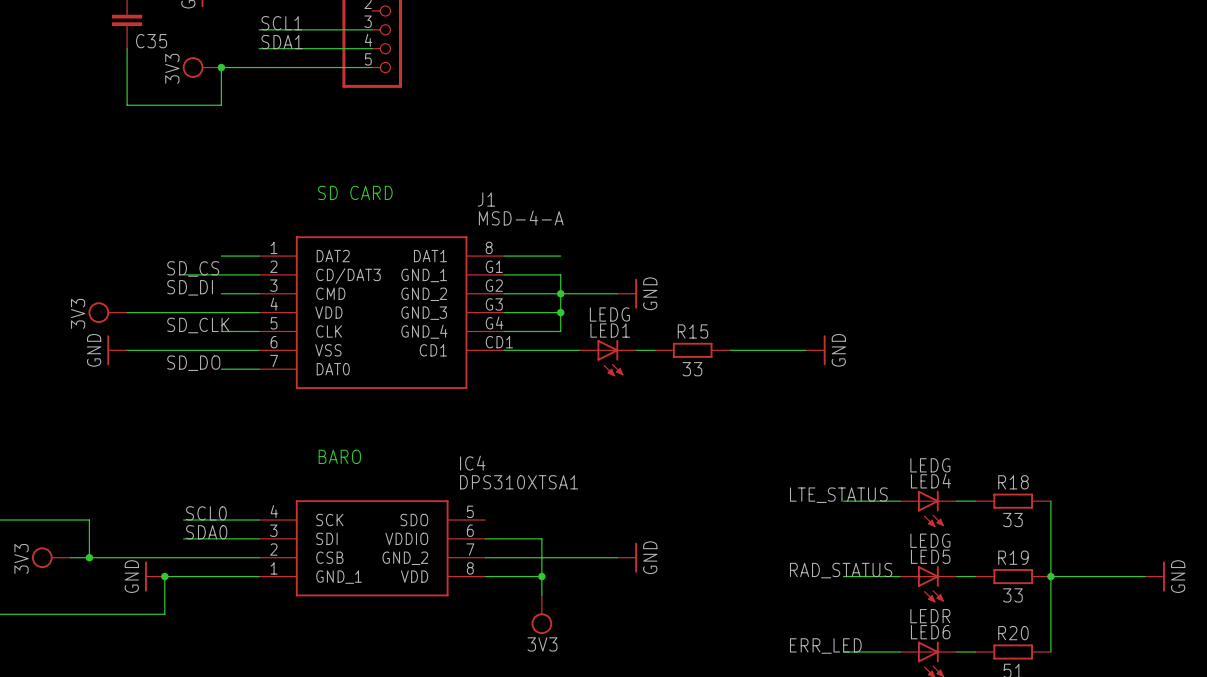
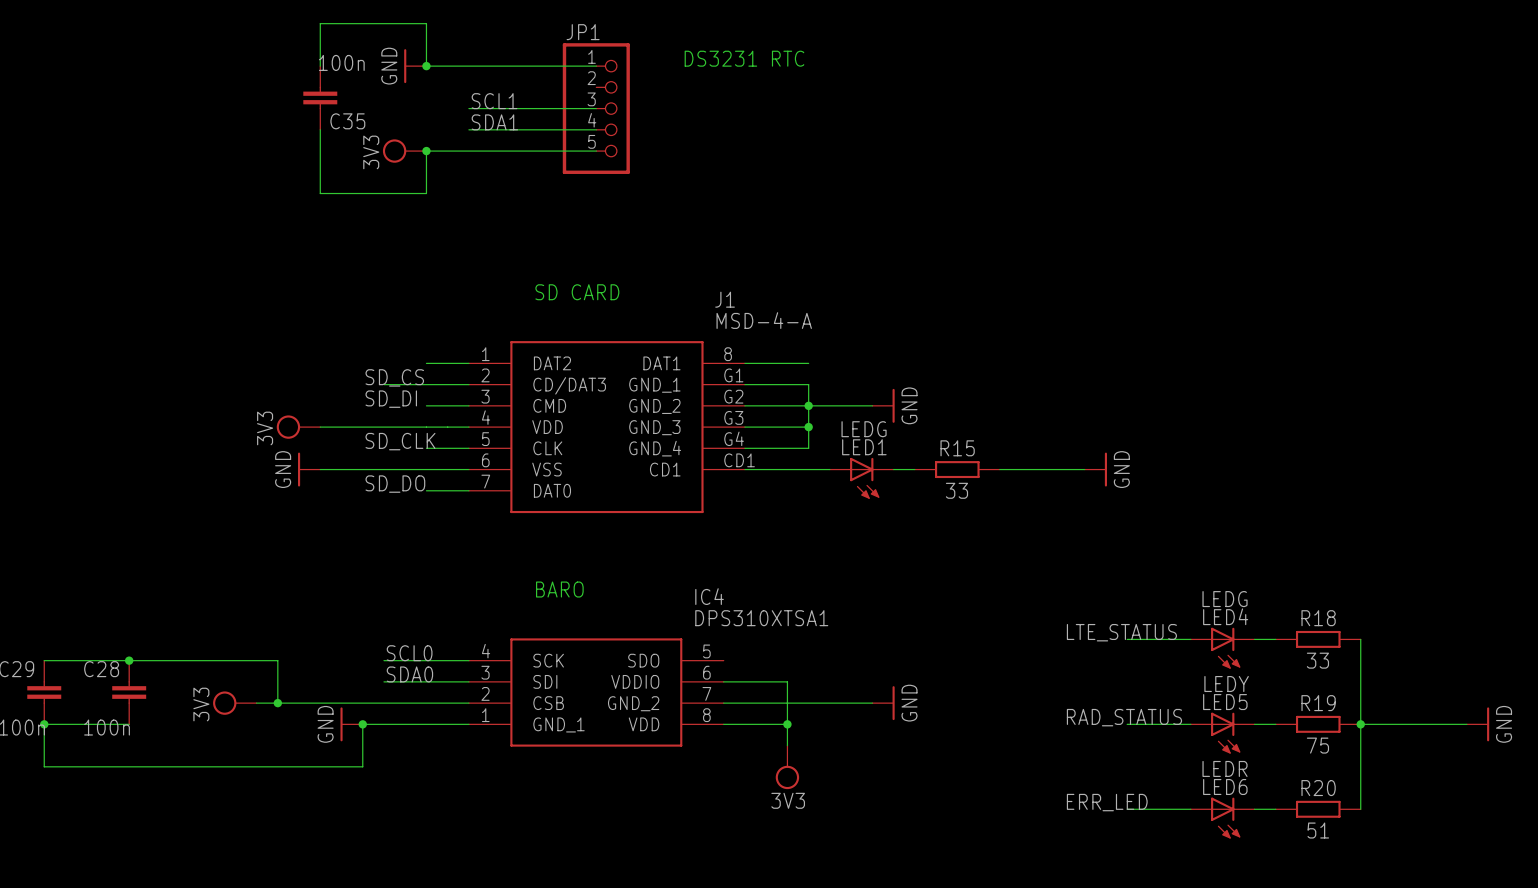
LED5 value: LEDG (930, 540) -> LEDY (1226, 684)
R19 value: 33 (1012, 595) -> 75 (1317, 745)

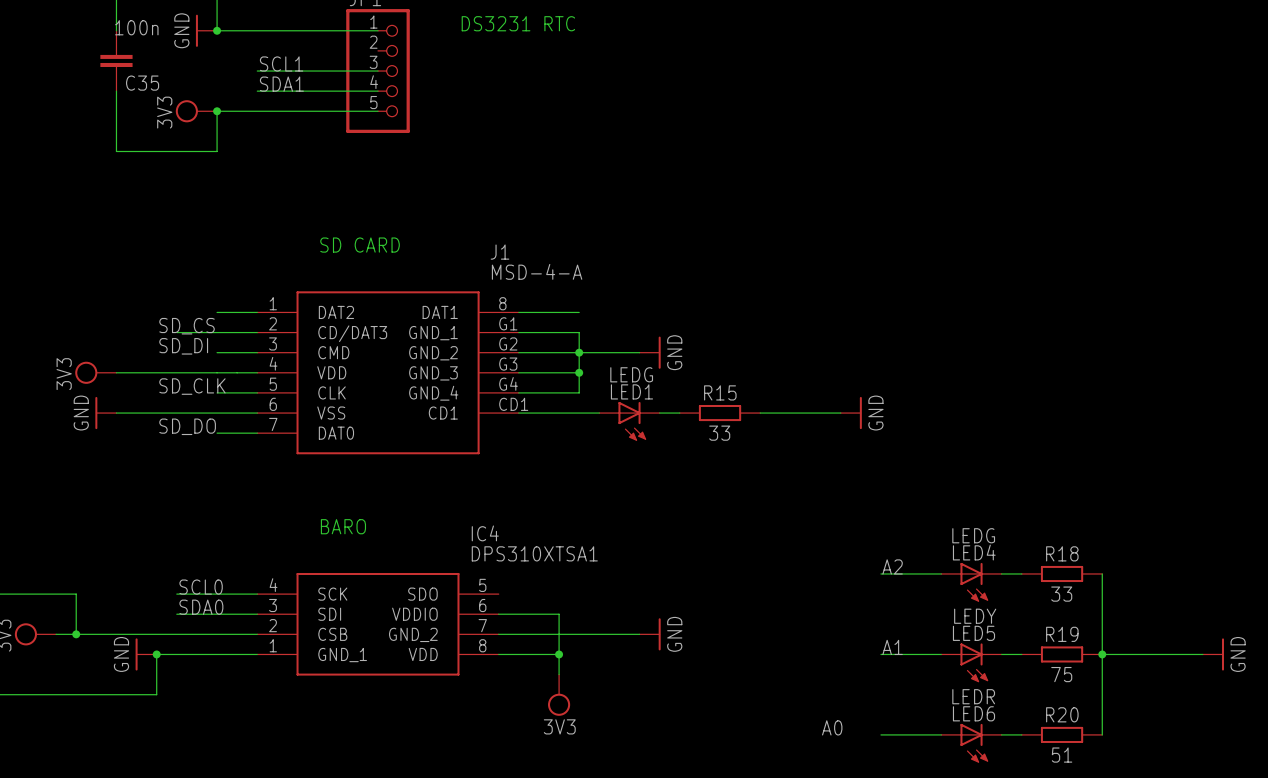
label: none -> A2 (892, 566)
label: LTE_STATUS (1121, 632) -> none
label: none -> A1 (892, 647)
label: RAD_STATUS (1124, 717) -> none
label: ERR_LED (1107, 802) -> A0 (832, 727)

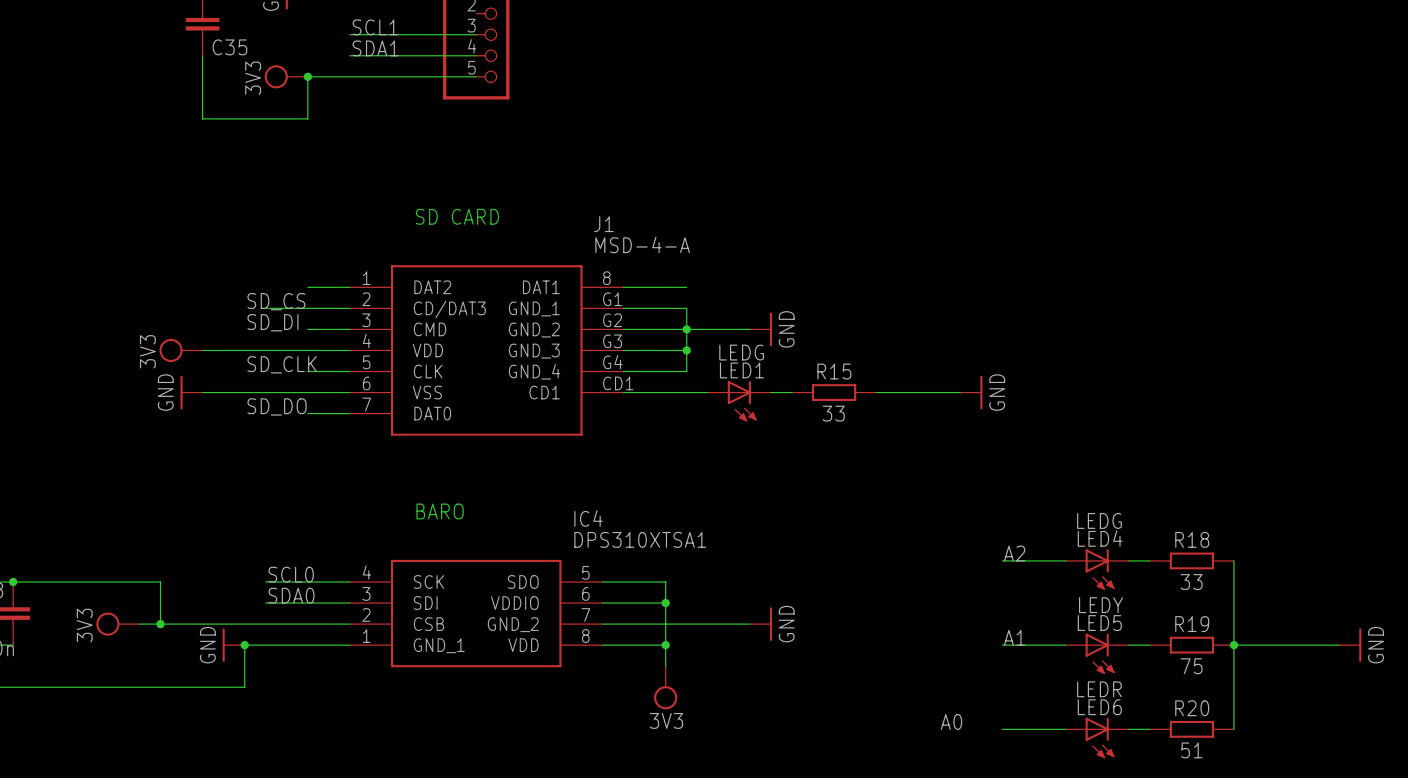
wire: none -> (602, 581) (665, 581) (665, 603)
junction: none -> (665, 603)

